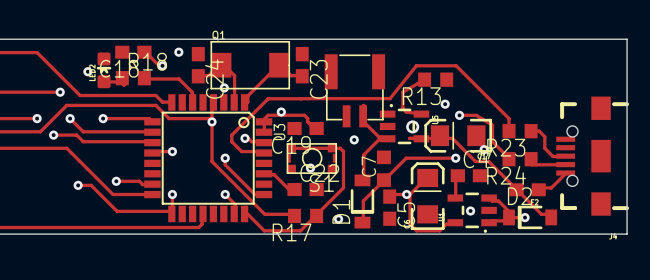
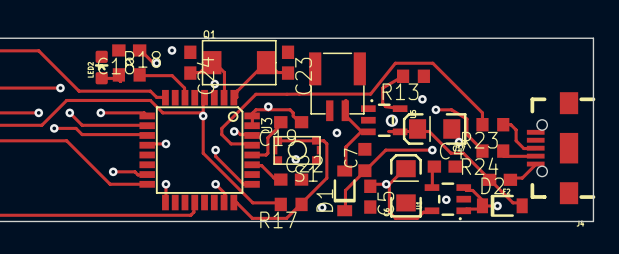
via: (87, 71) -> none
track: none -> (280, 122) (280, 124) (267, 137) (267, 153) (266, 155) (252, 155)
track: (78, 185) (91, 185) (117, 211) (169, 211) (171, 213) -> none
via: (78, 185) -> none

